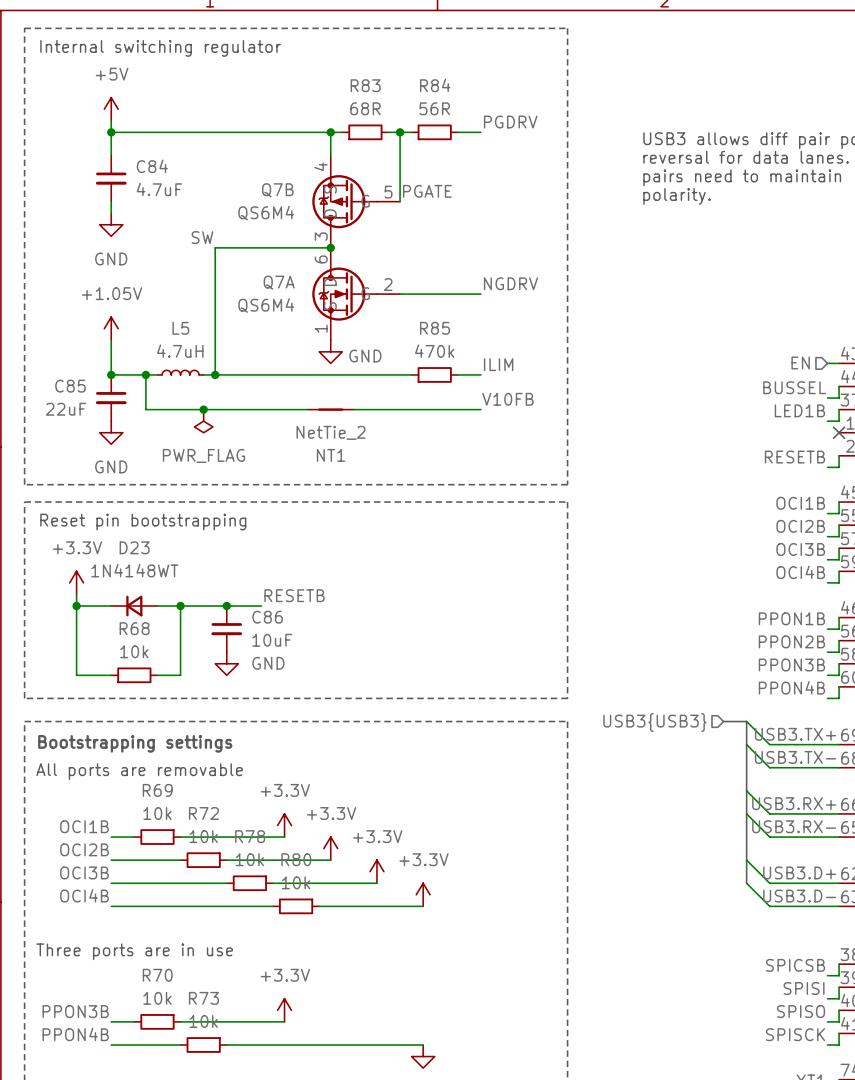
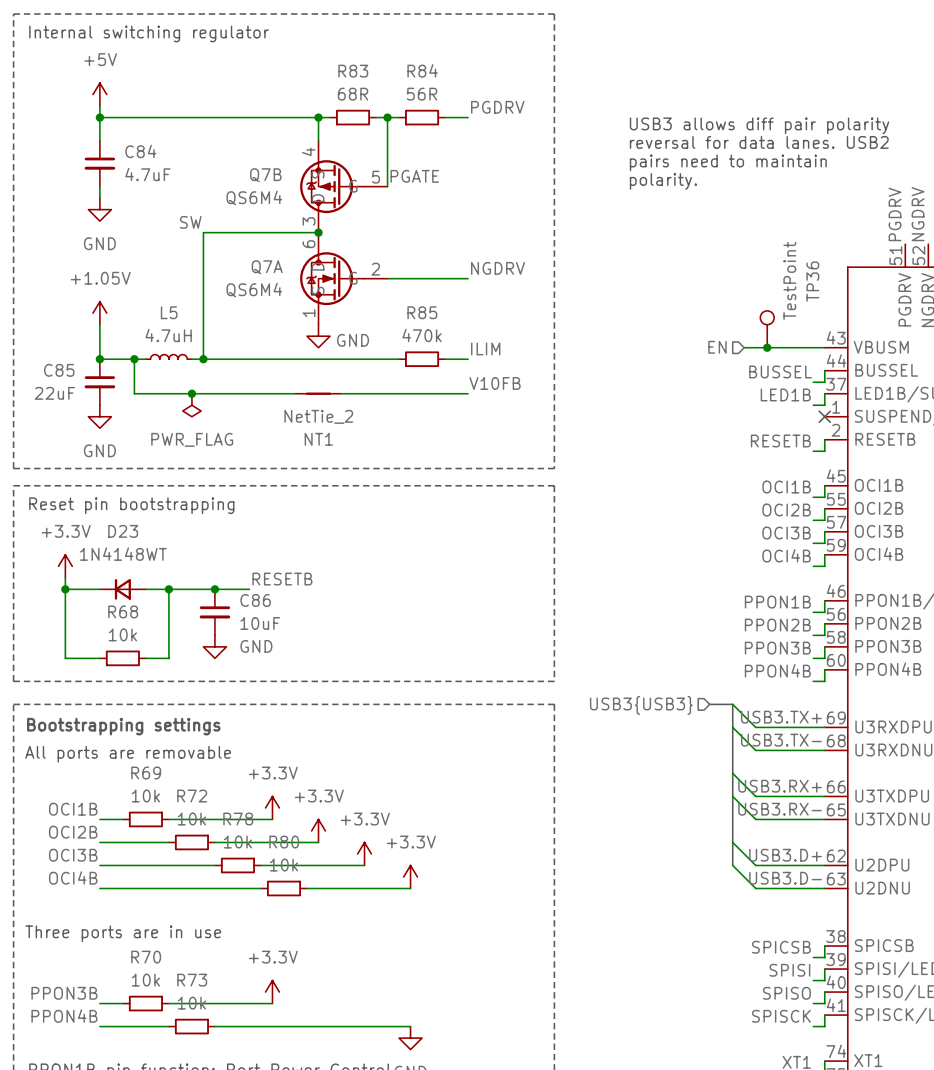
TP36: none -> TestPoint (767, 329)
hierarchical label position: EN (800, 362) -> EN (717, 347)
wire: none -> (744, 347) (813, 347)
junction: none -> (767, 347)

